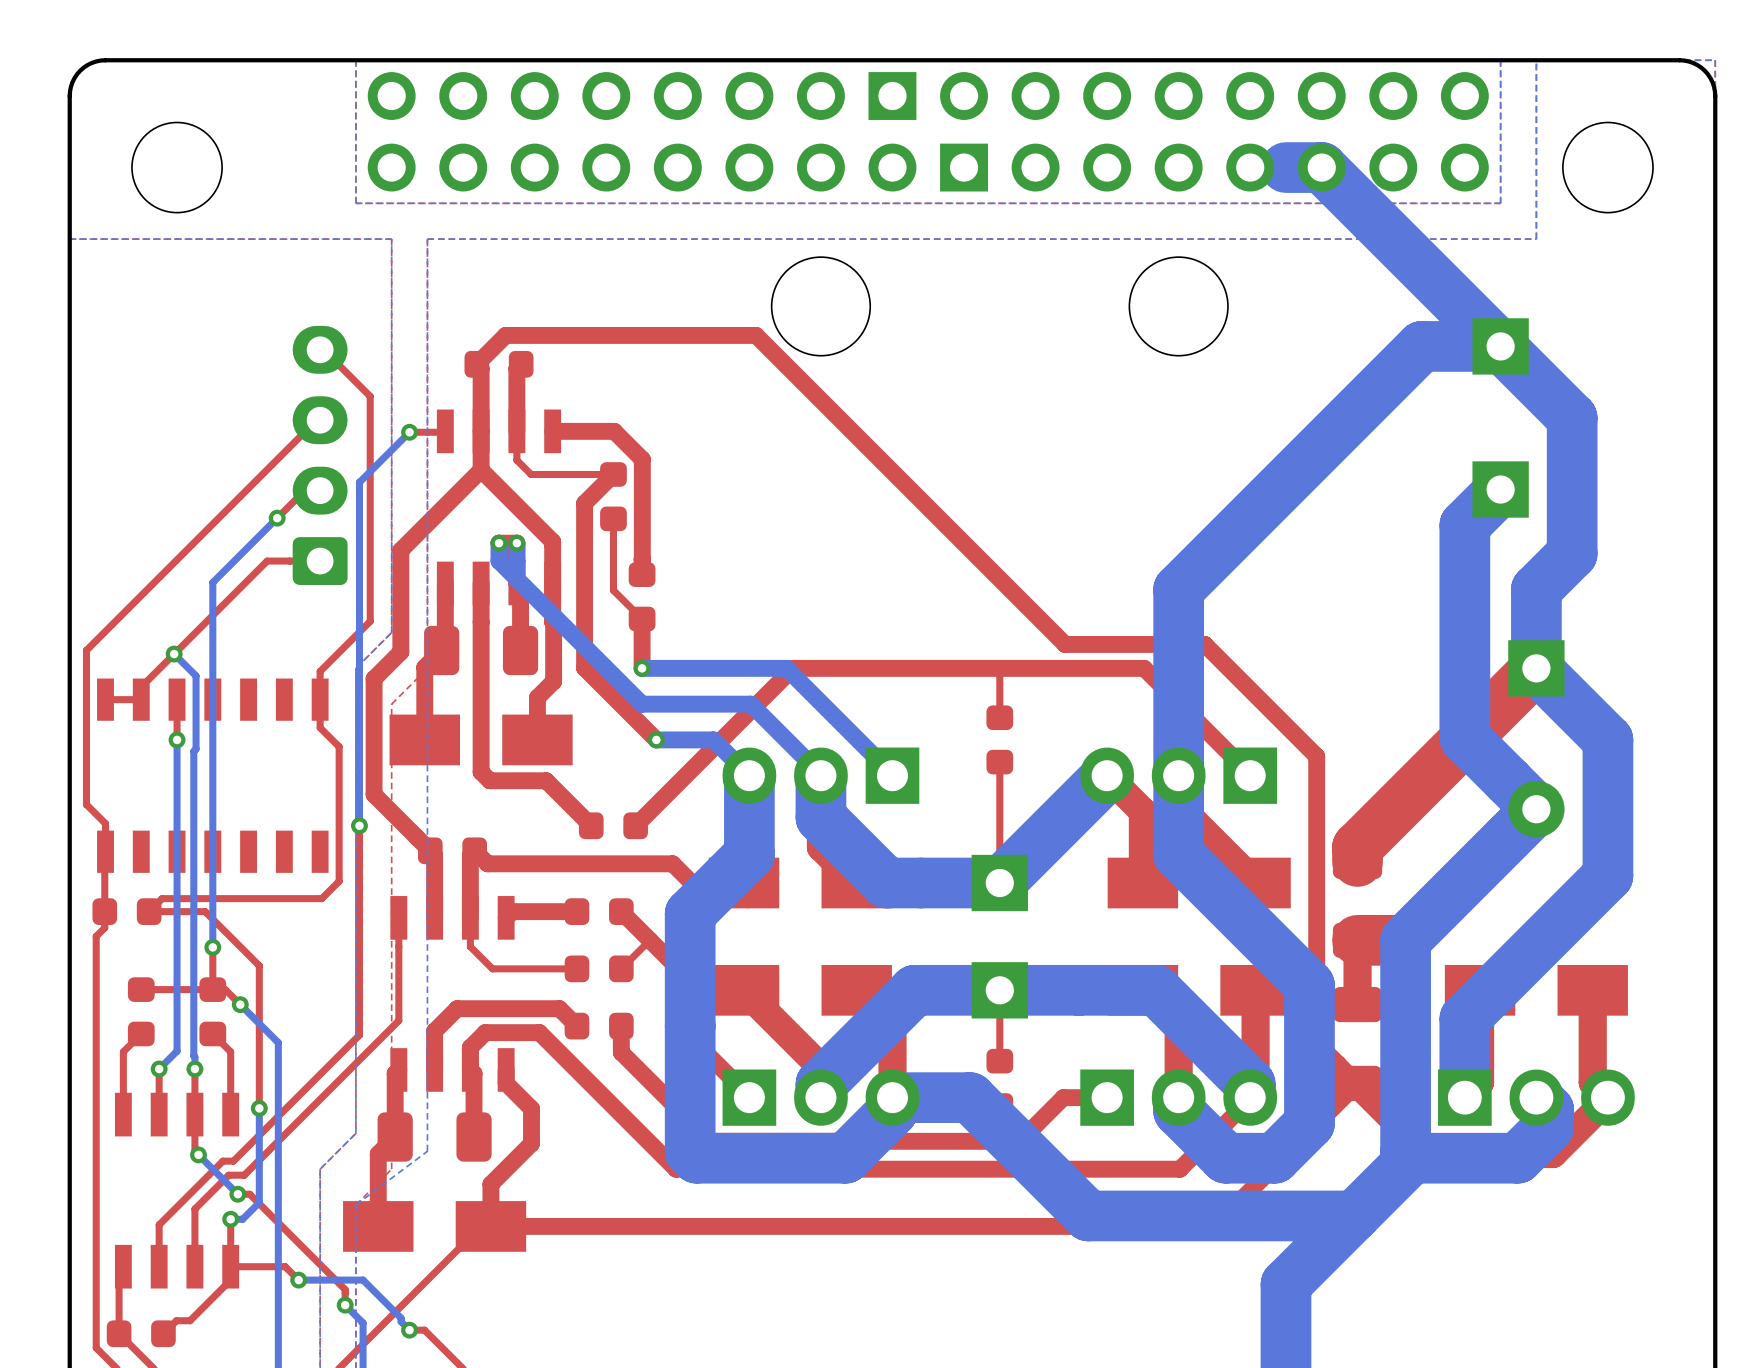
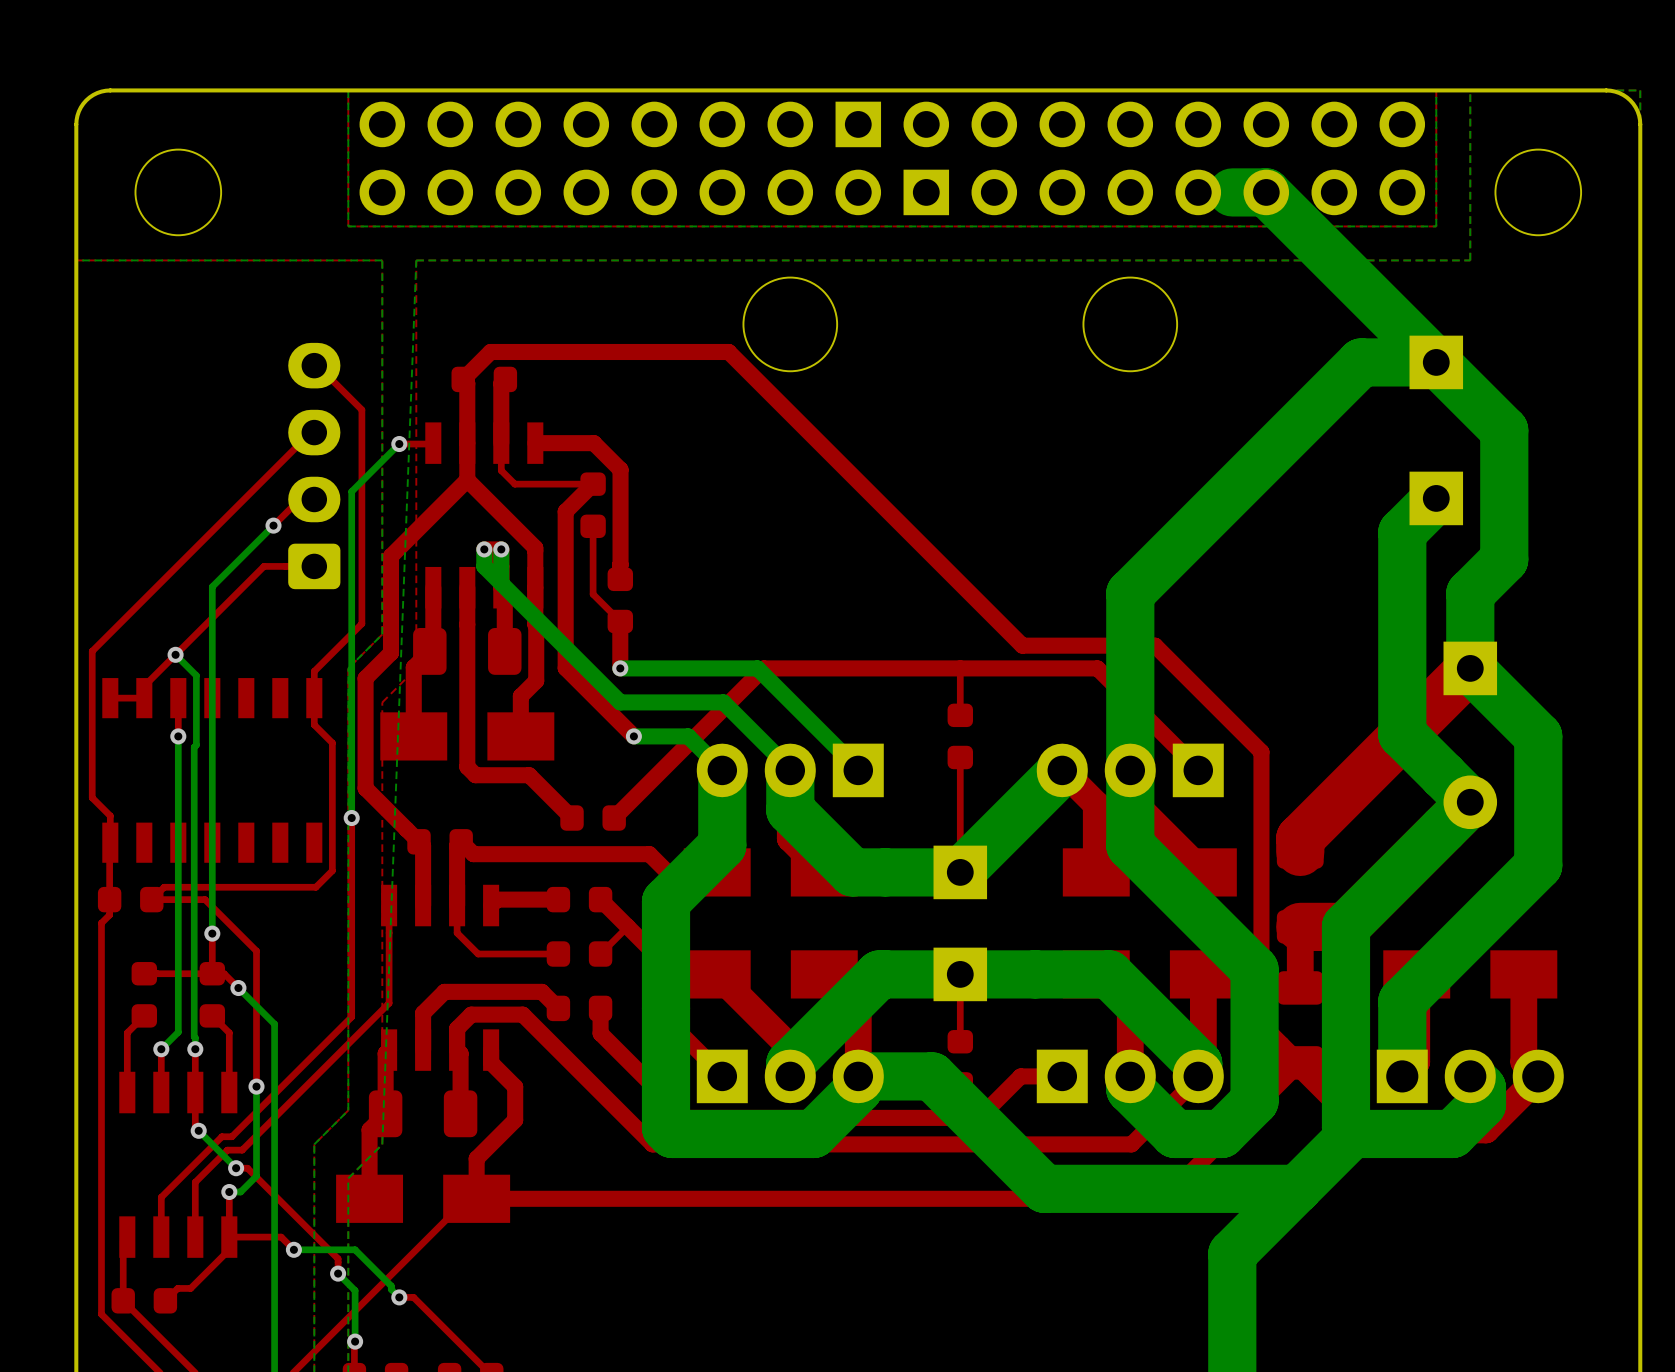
bottom zone outline: (427, 239) (427, 1151) (355, 1204) -> (416, 260) (382, 1144) (348, 1178)

